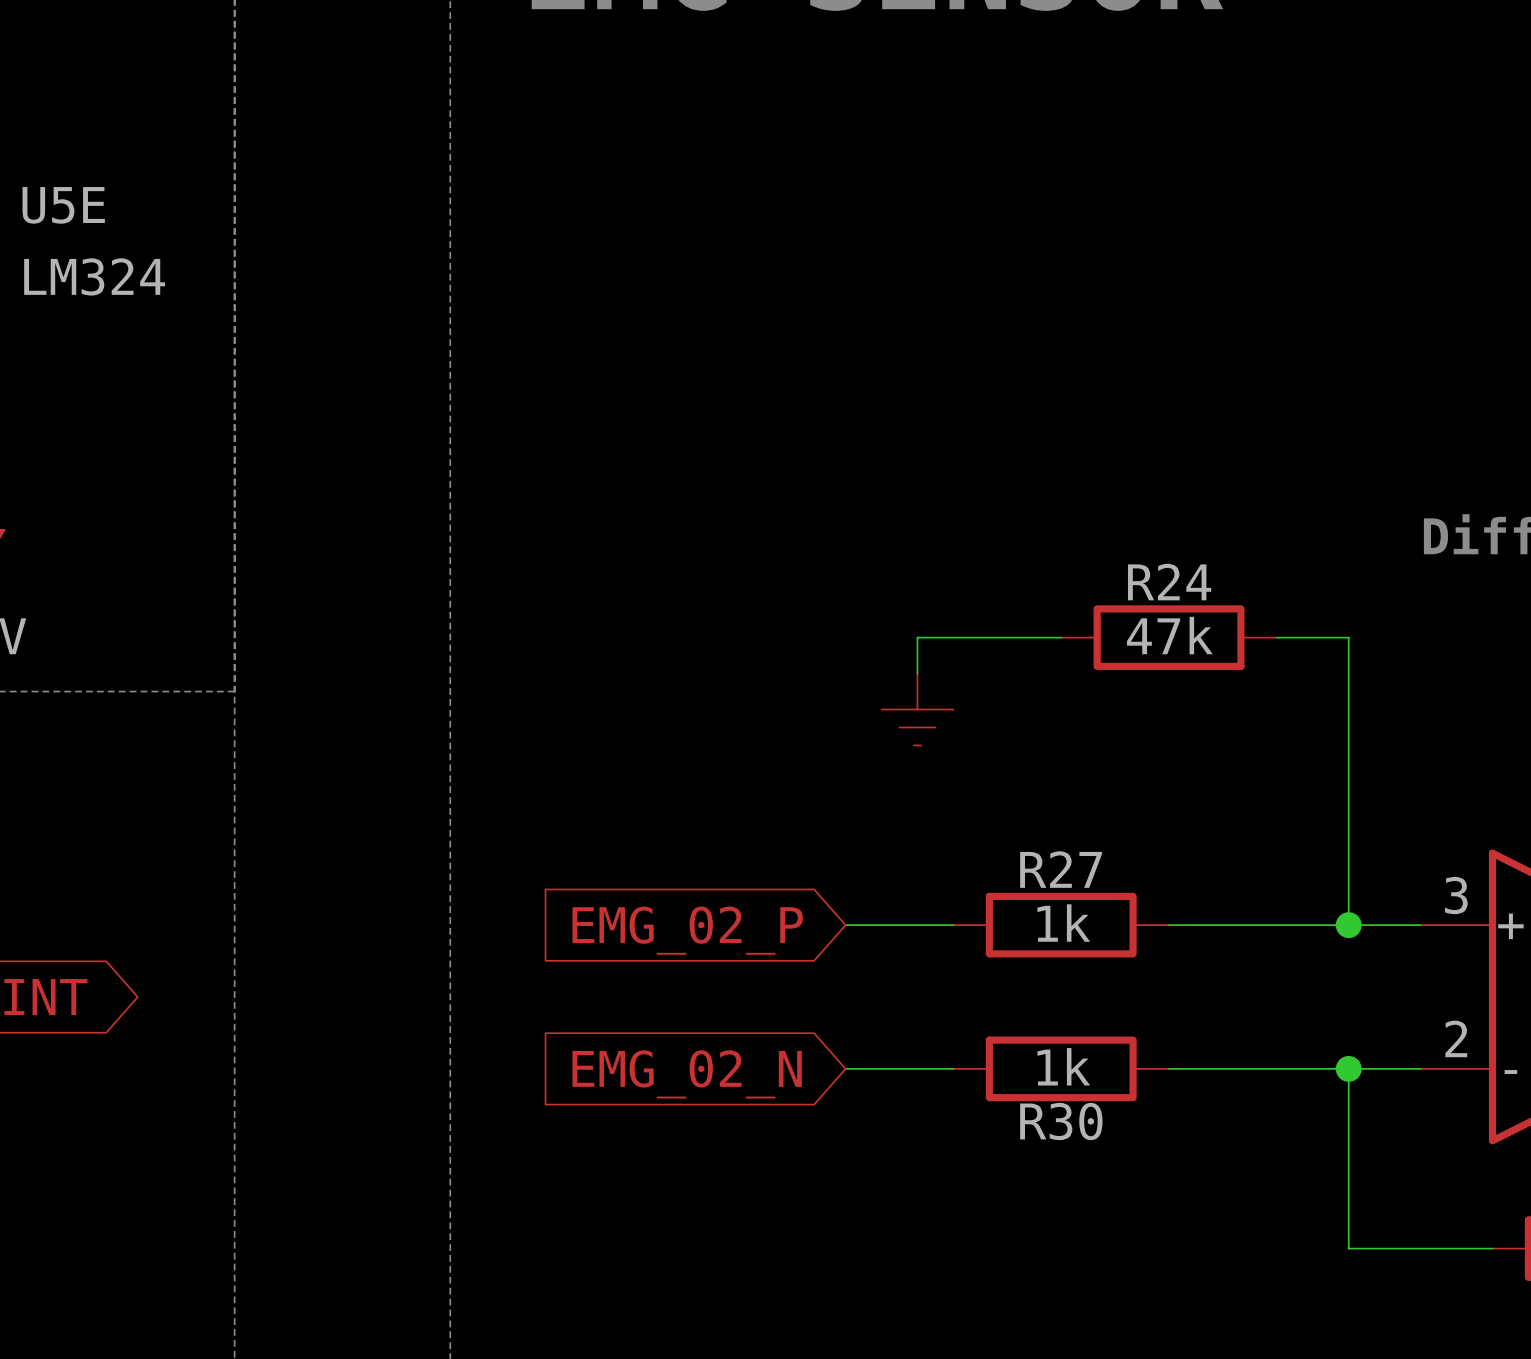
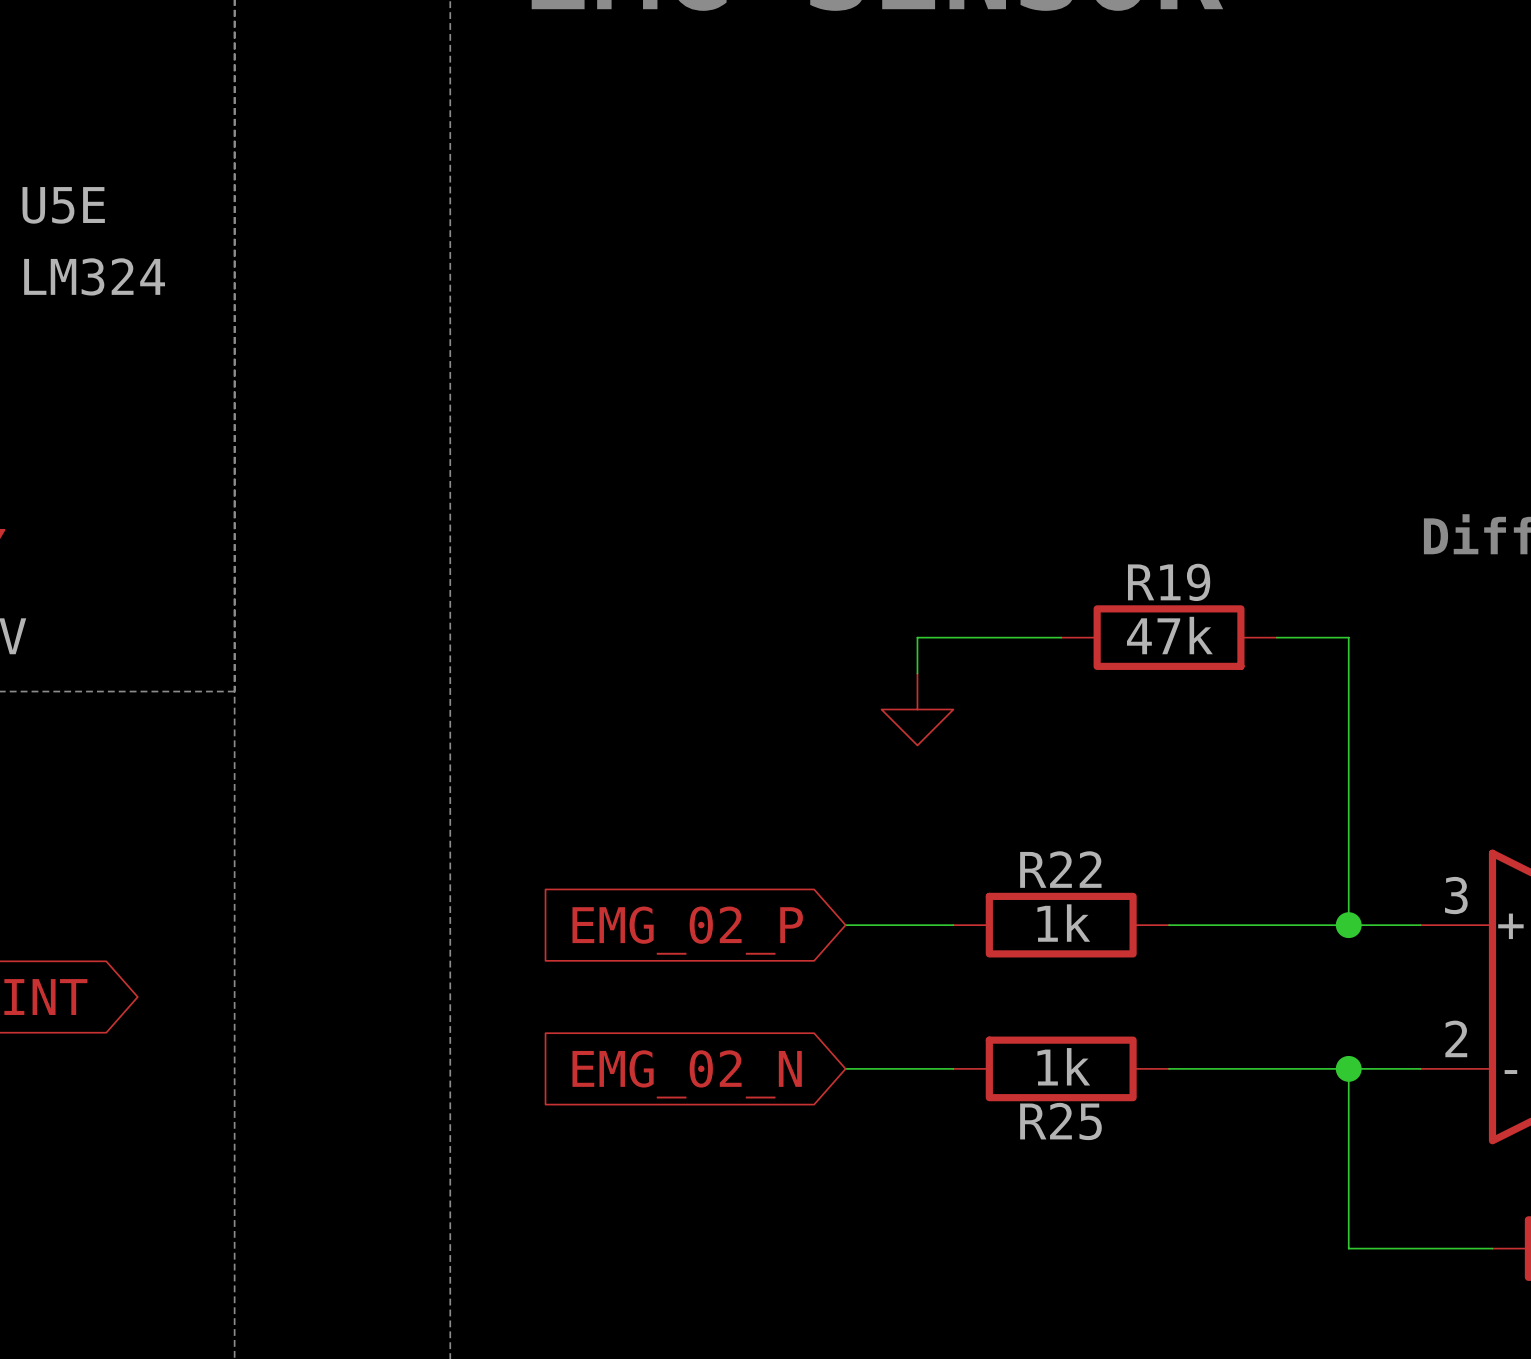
R24 name: R24 (1169, 582) -> R19 (1169, 582)
power symbol shape: [881, 673, 954, 746] -> [881, 673, 954, 746]
R27 name: R27 (1061, 869) -> R22 (1060, 869)
R30 name: R30 (1061, 1121) -> R25 (1060, 1121)

